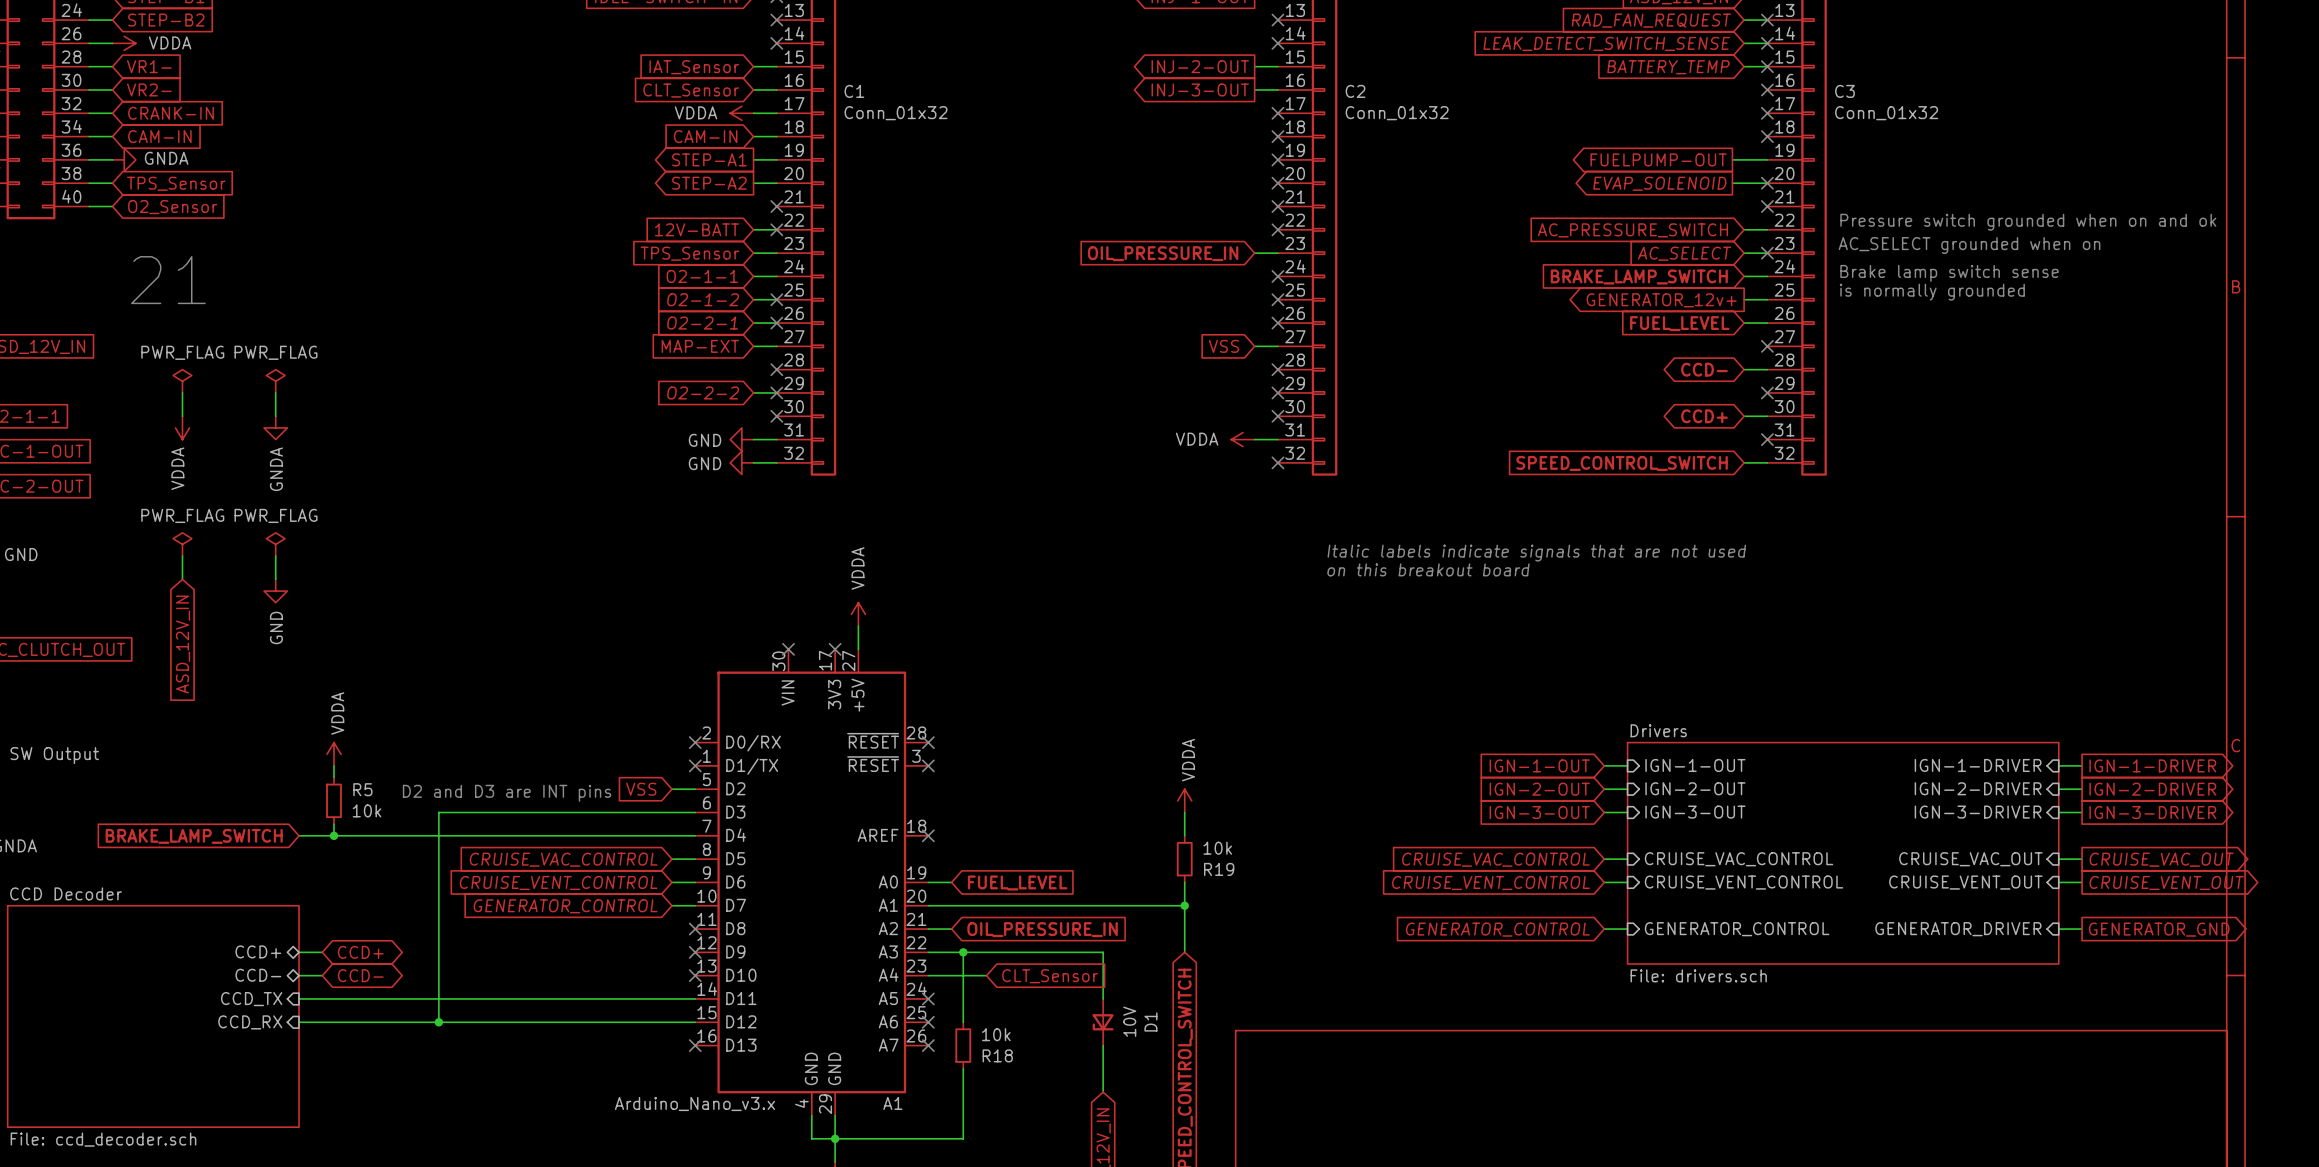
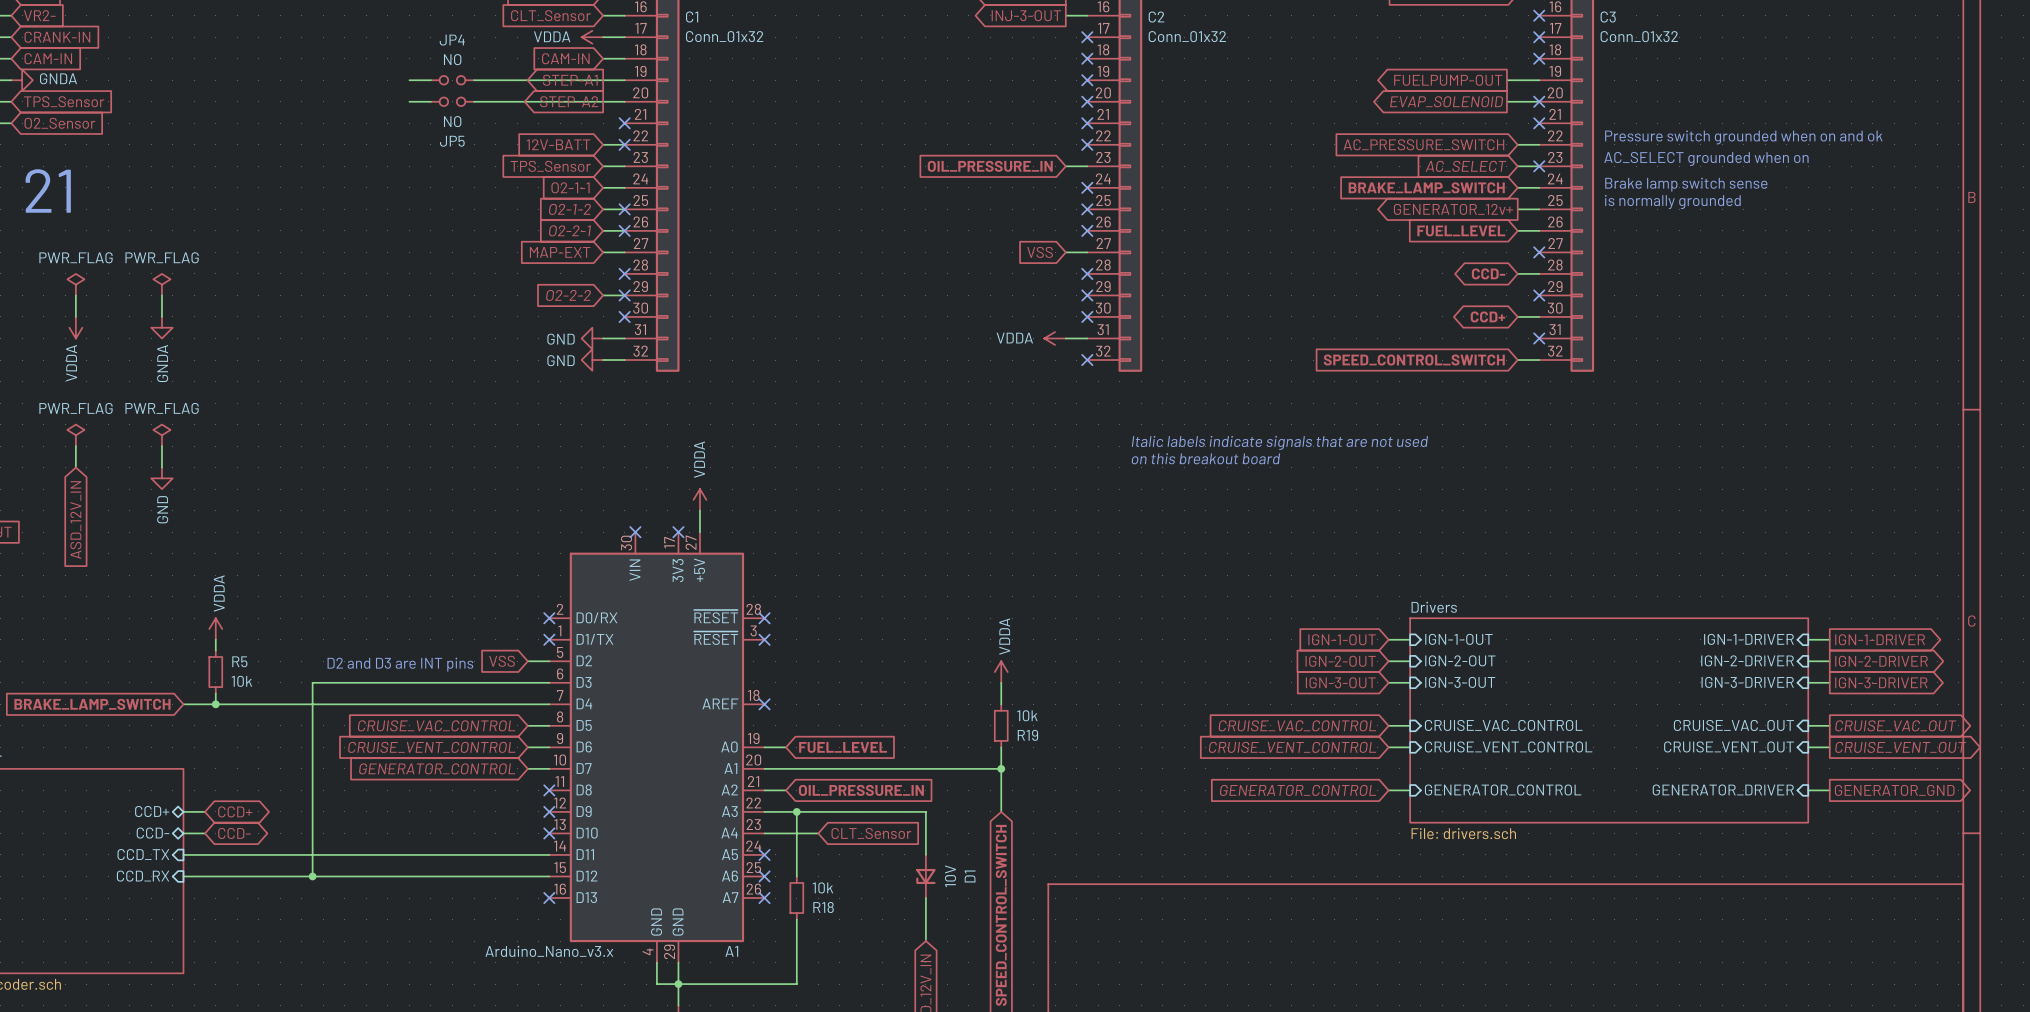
wire: none -> (409, 80) (430, 80)
JP4: none -> NO (452, 80)
wire: none -> (474, 80) (603, 80)
wire: none -> (409, 101) (430, 101)
JP5: none -> NO (452, 101)
wire: none -> (474, 101) (603, 101)

